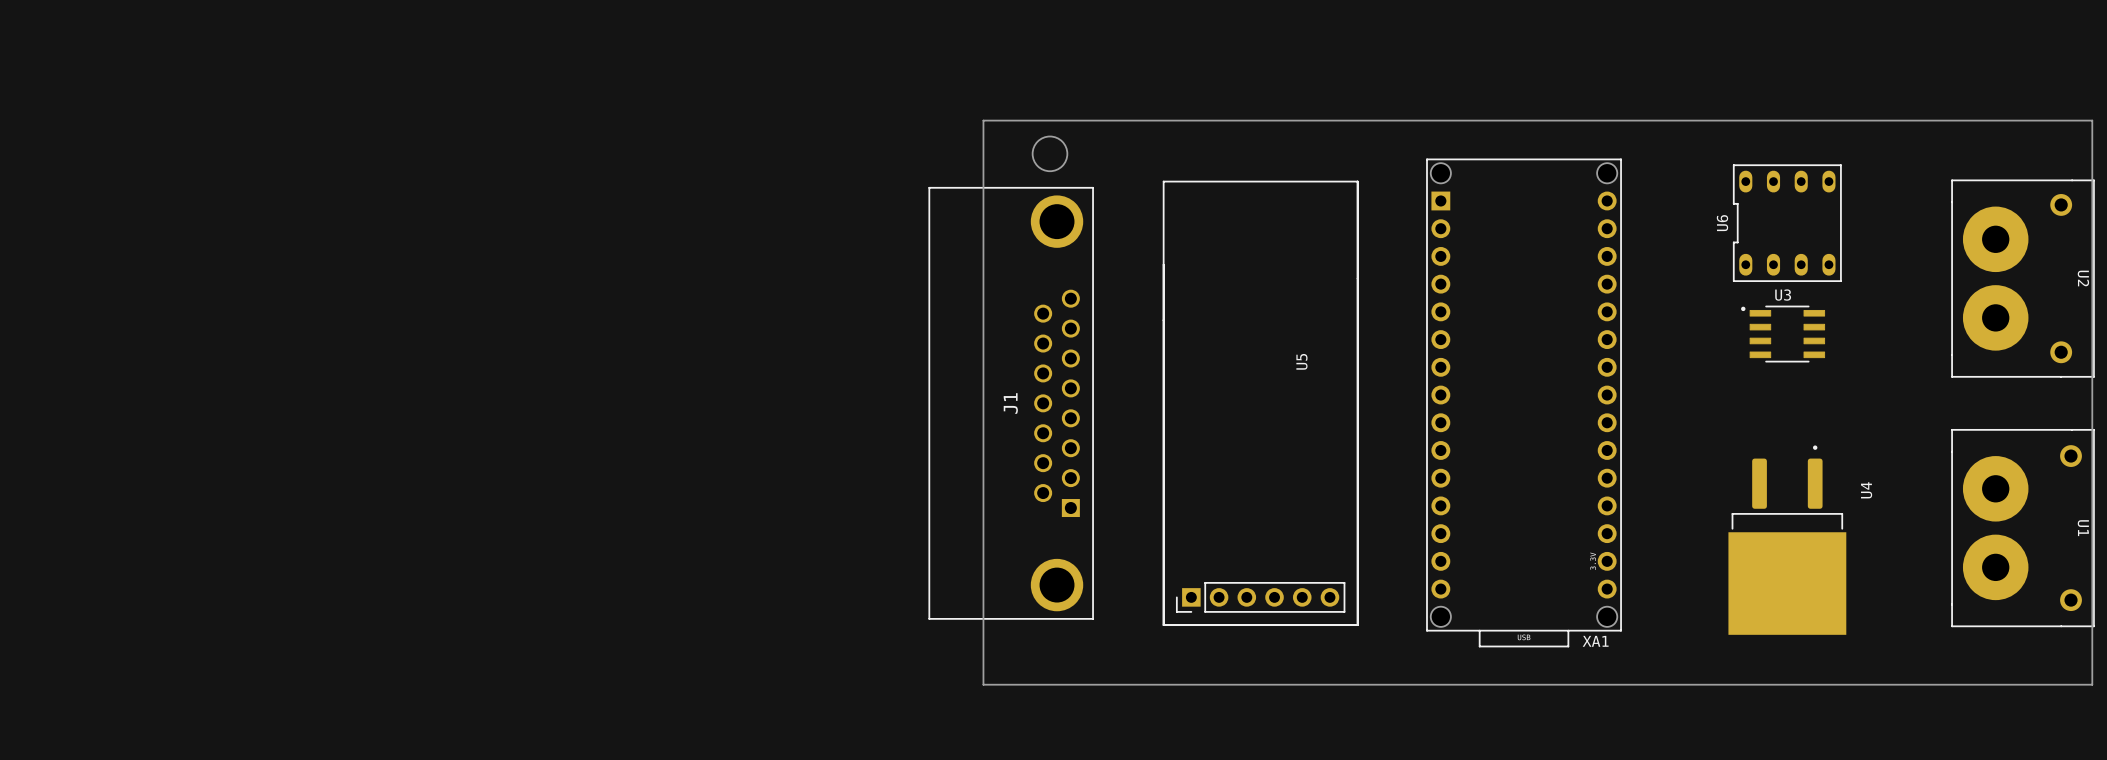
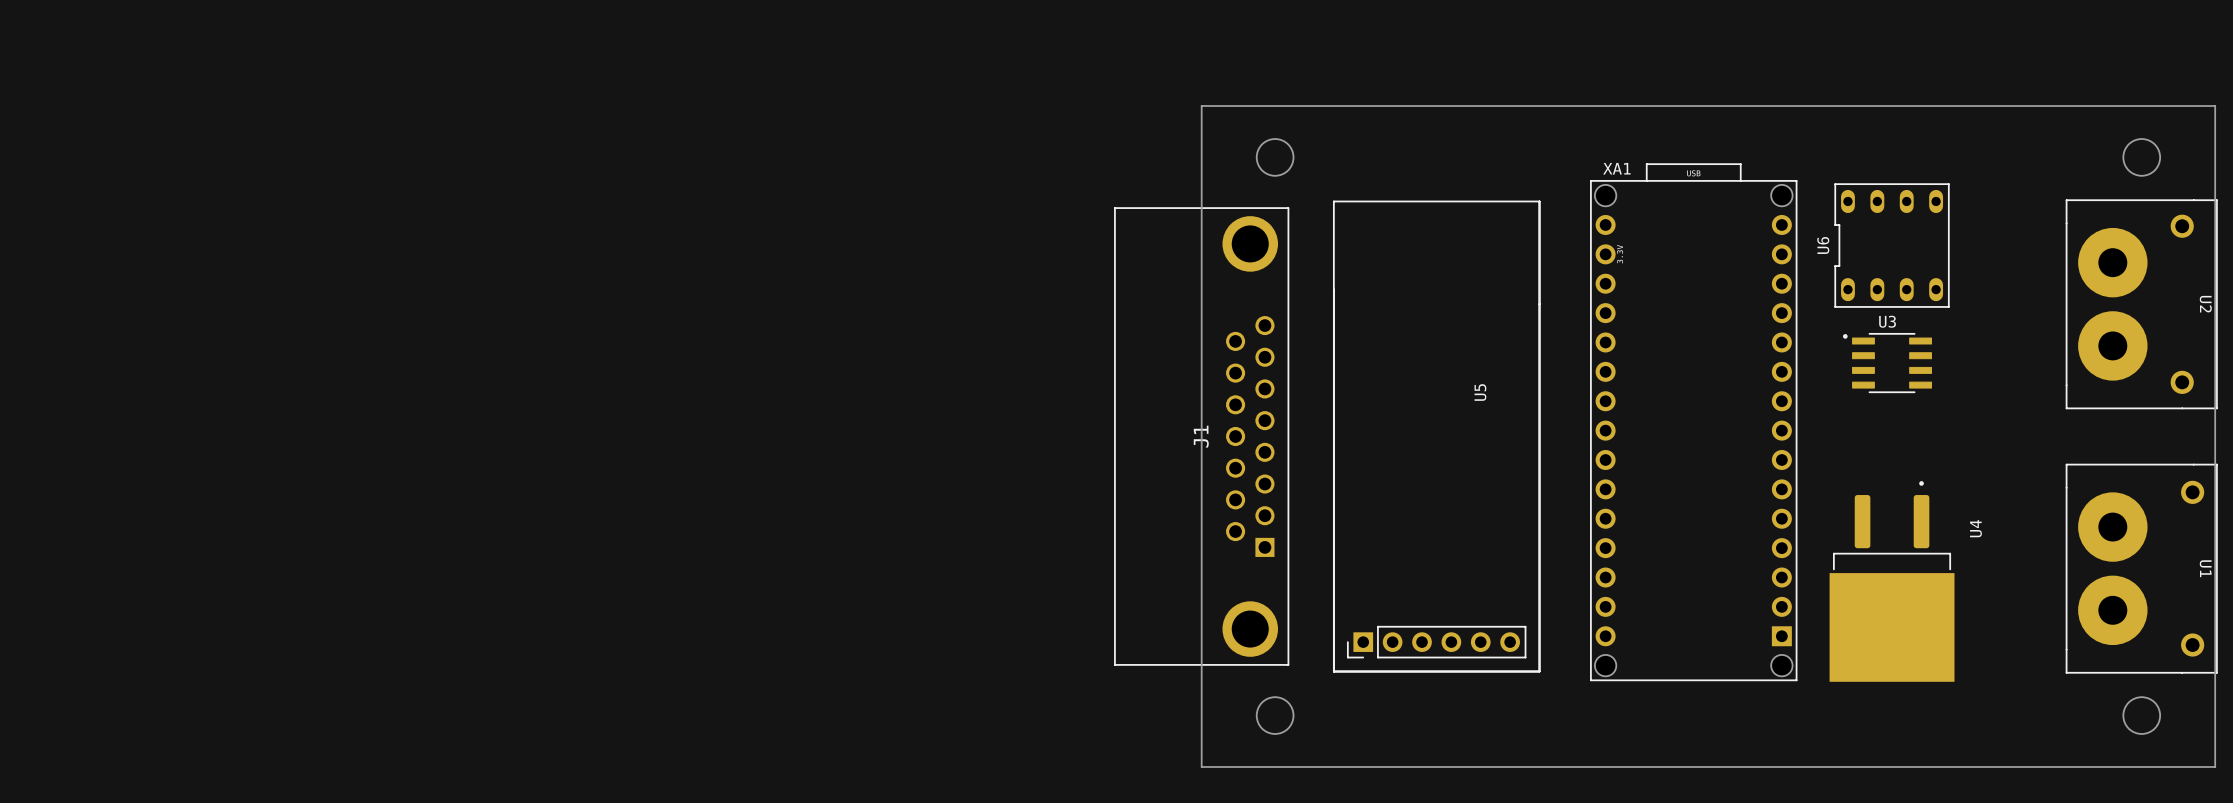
board edge: (2092, 120) (983, 120) (983, 684) (2092, 684) -> (2215, 136) (2215, 106) (1201, 106) (1201, 766) (2215, 766) (2215, 734)
round board edge: none -> [2122, 138, 2161, 177]
round board edge position: (1049, 153) -> (1275, 157)
XA1 rotation: 0° (1524, 402) -> 180° (1693, 422)
J1 position: (1011, 403) -> (1201, 436)
U5 position: (1260, 403) -> (1436, 436)
round board edge: none -> [1256, 696, 1295, 735]
round board edge: none -> [2122, 696, 2161, 735]

